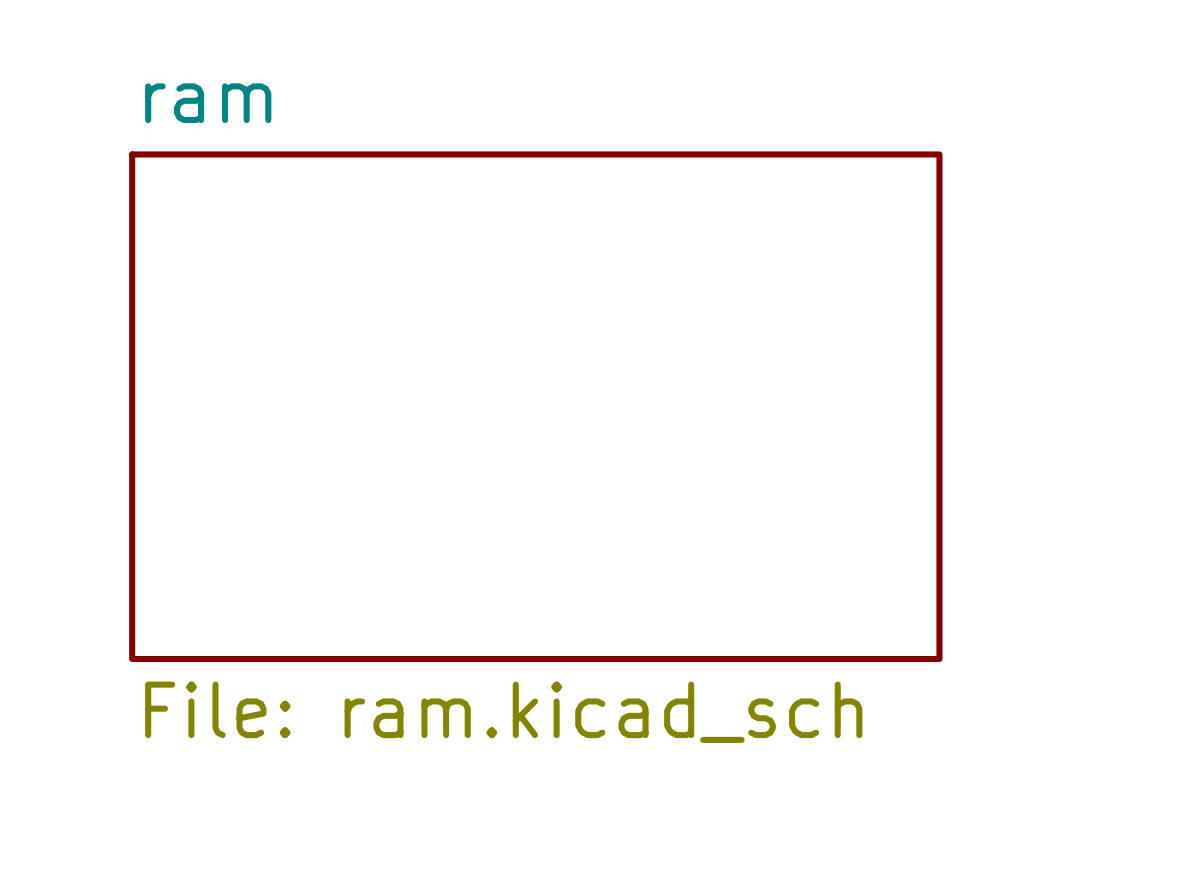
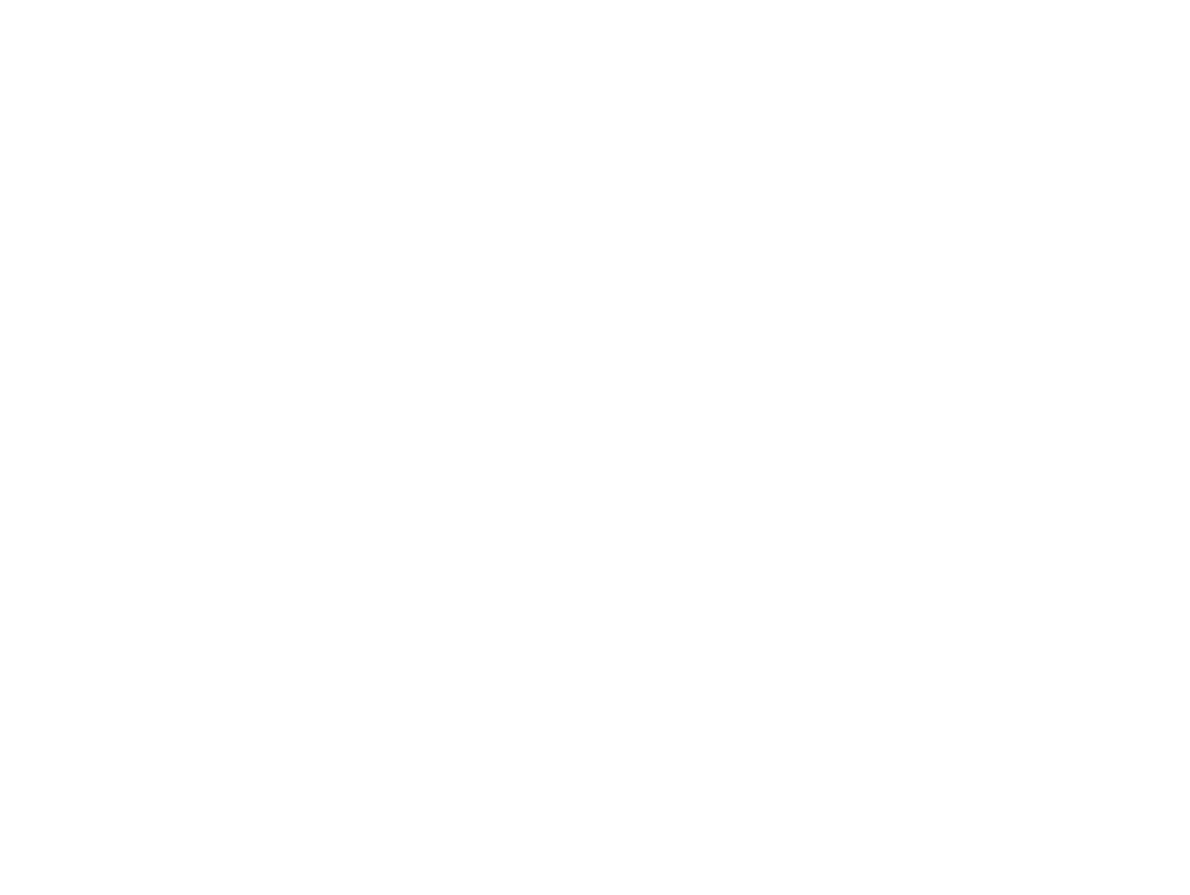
sheet ram: File: ram.kicad_sch (535, 406) -> none

